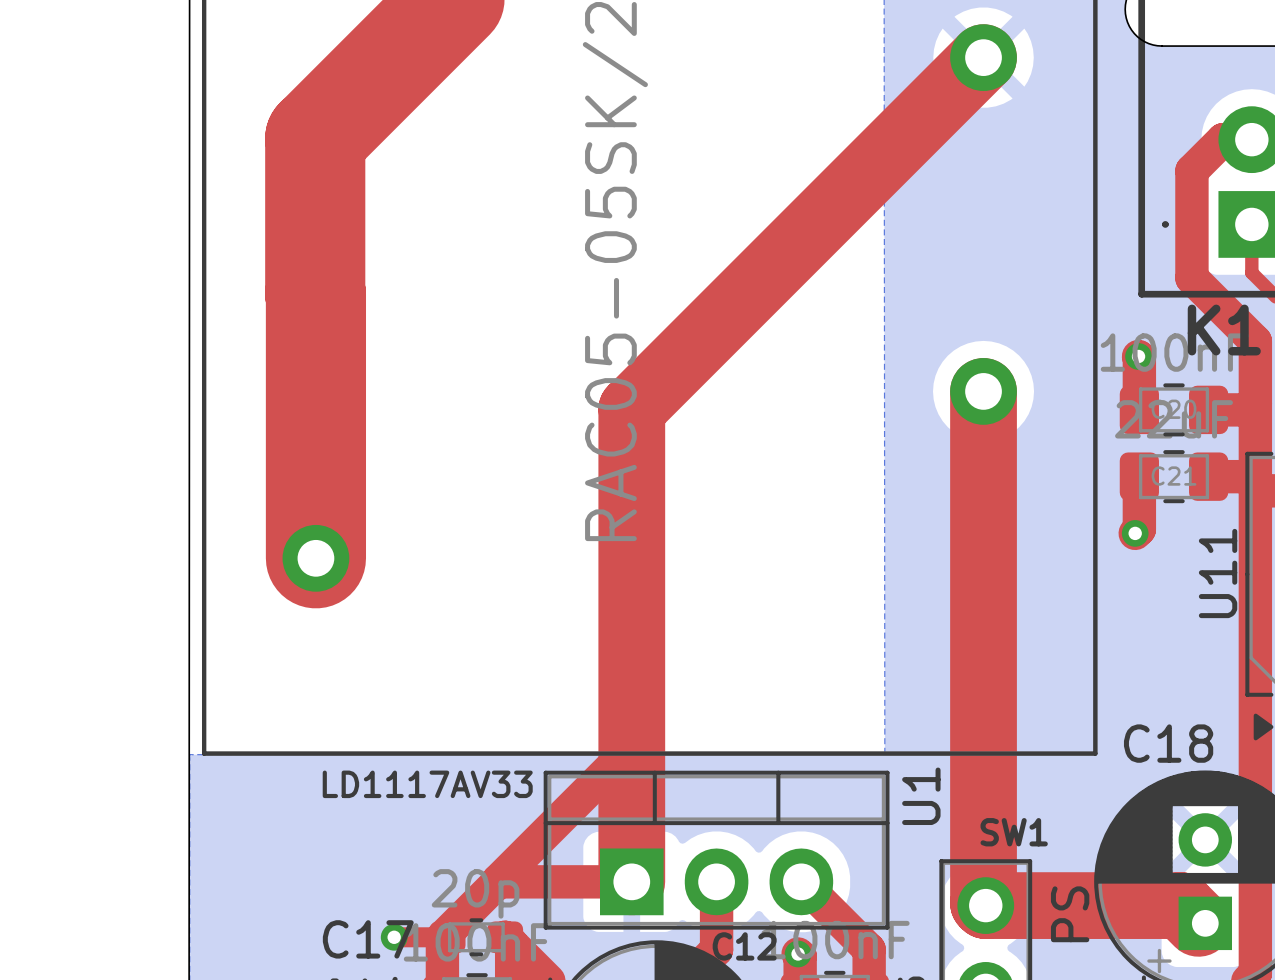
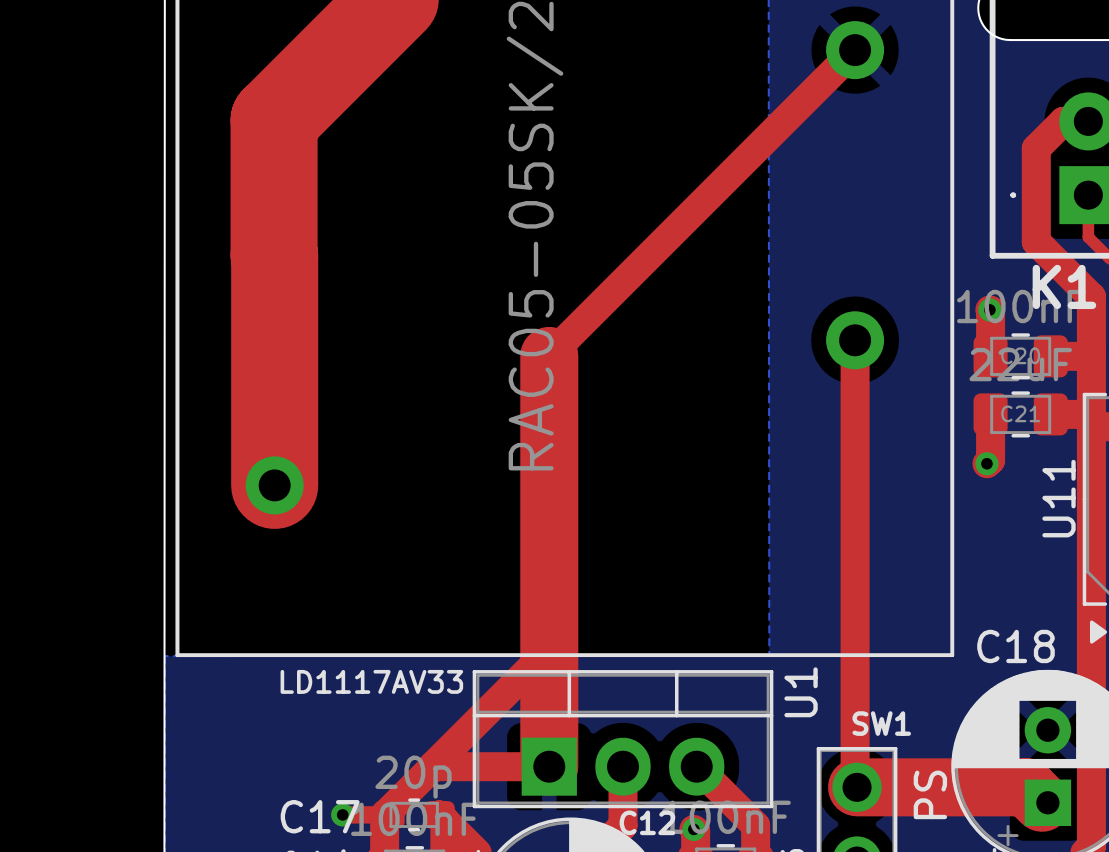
top track width: thick (983, 57) (631, 409) -> thin (855, 50) (549, 355)
top track width: thick (983, 391) (983, 903) (985, 905) -> thin (855, 340) (855, 785) (857, 787)

